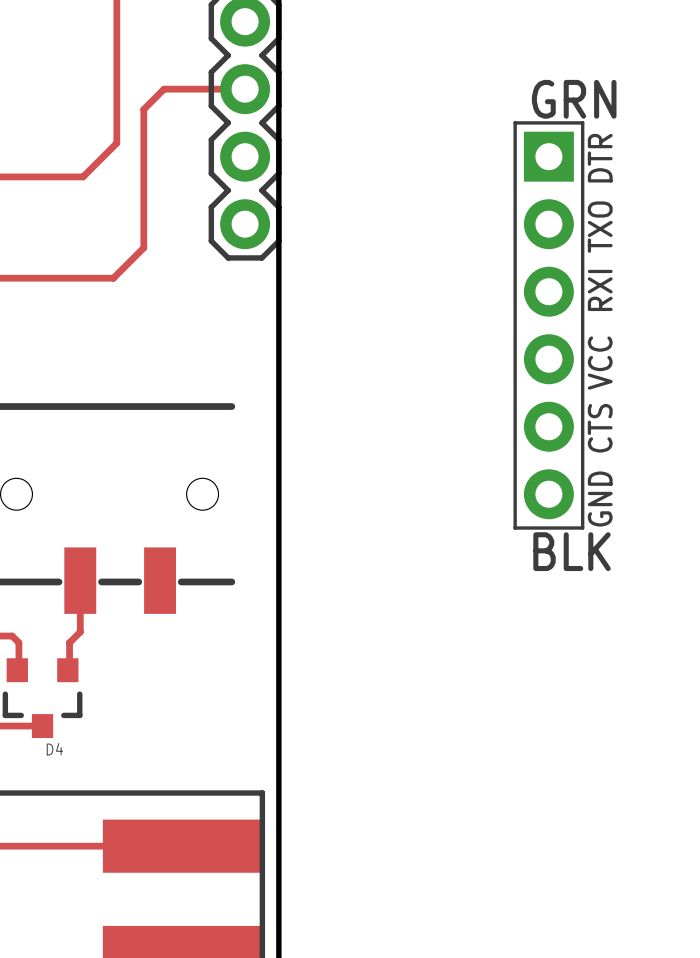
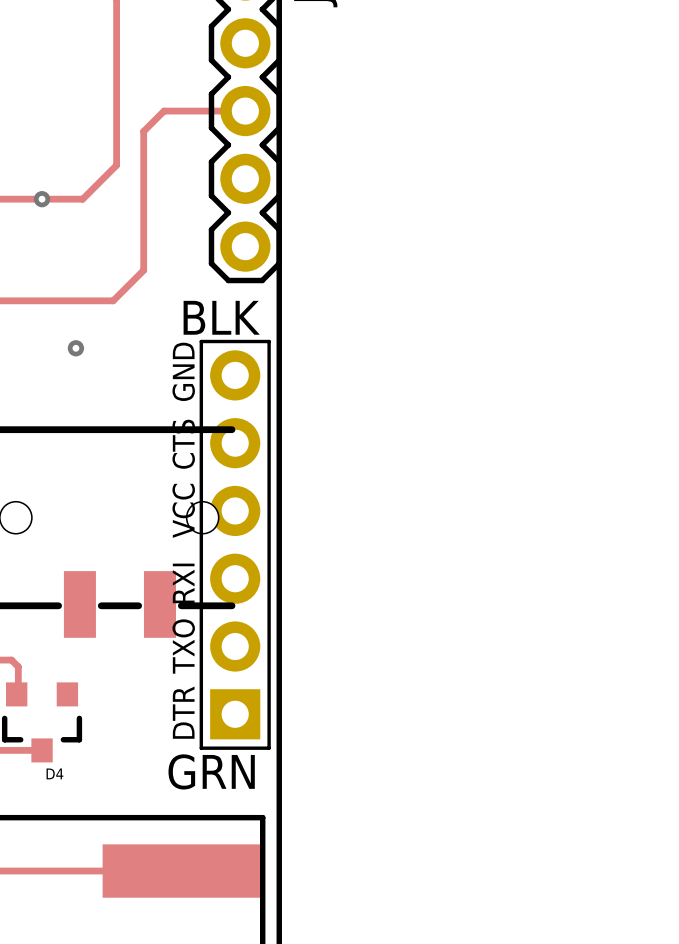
via: none -> (42, 199)
via: none -> (75, 348)
part: (548, 325) -> none
part: none -> (235, 544)
track: (80, 580) (80, 632) (69, 642) (69, 668) (67, 670) -> none

